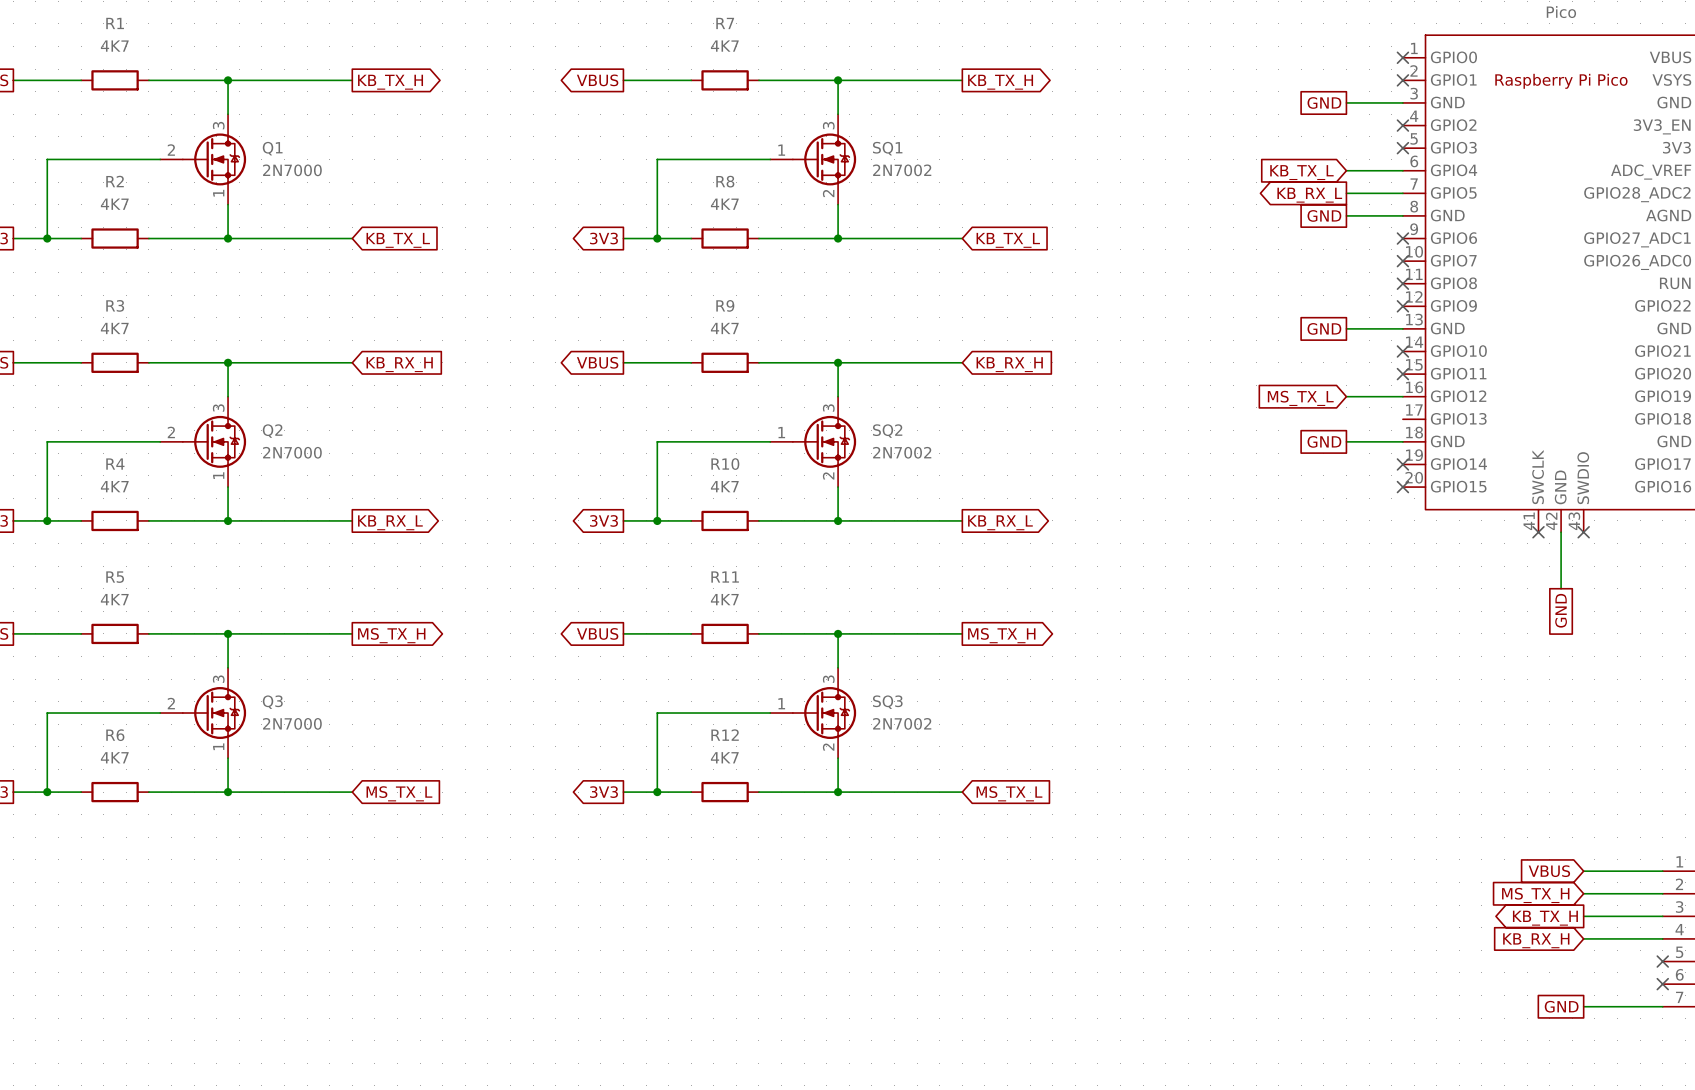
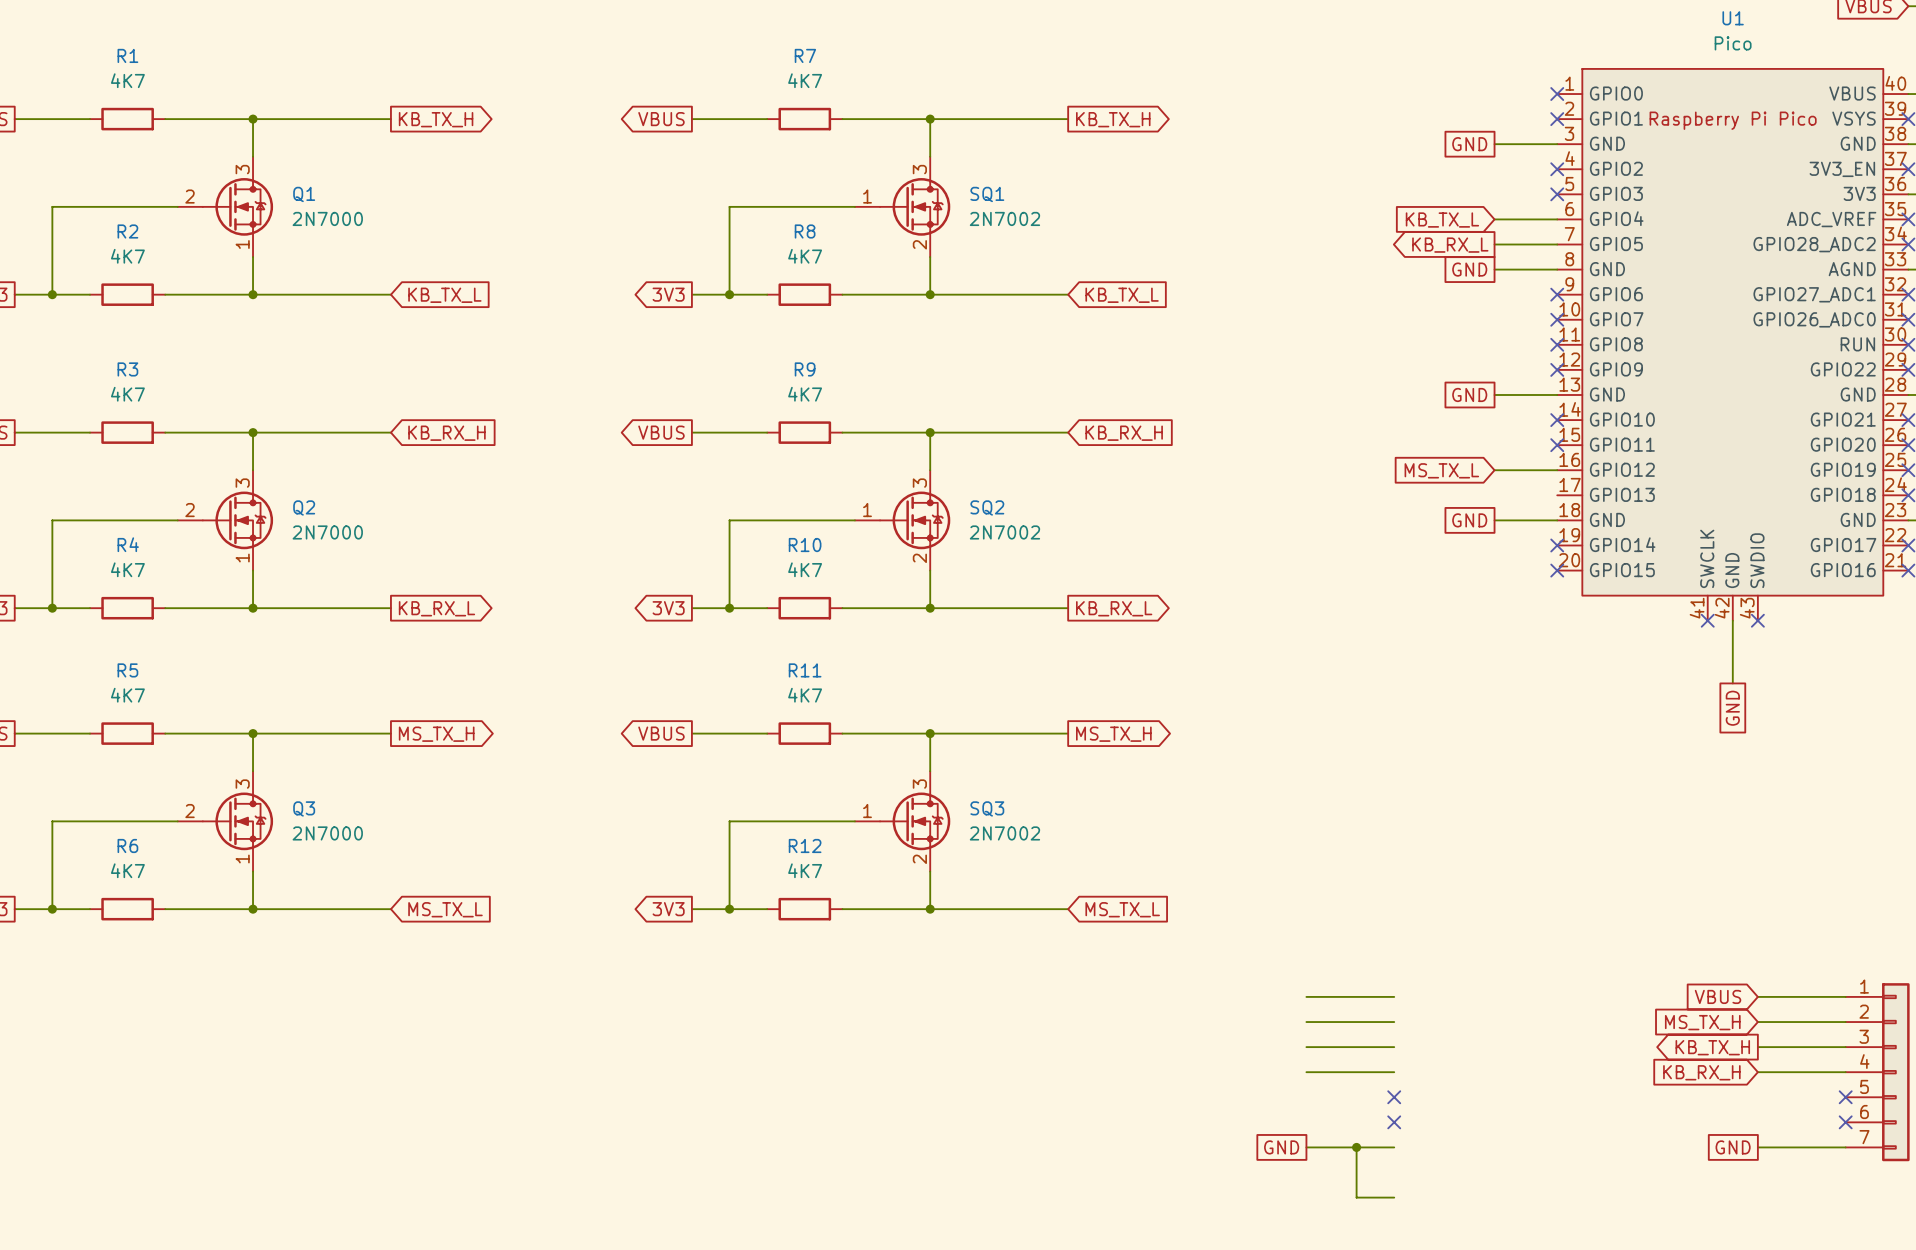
wire: none -> (1306, 996) (1394, 996)
wire: none -> (1306, 1022) (1394, 1022)
wire: none -> (1306, 1047) (1394, 1047)
wire: none -> (1306, 1072) (1394, 1072)
no-connect mark: none -> (1394, 1097)
no-connect mark: none -> (1394, 1122)
global label: none -> GND (1281, 1147)
wire: none -> (1306, 1147) (1394, 1147)
wire: none -> (1356, 1147) (1356, 1197) (1394, 1197)
junction: none -> (1356, 1147)

